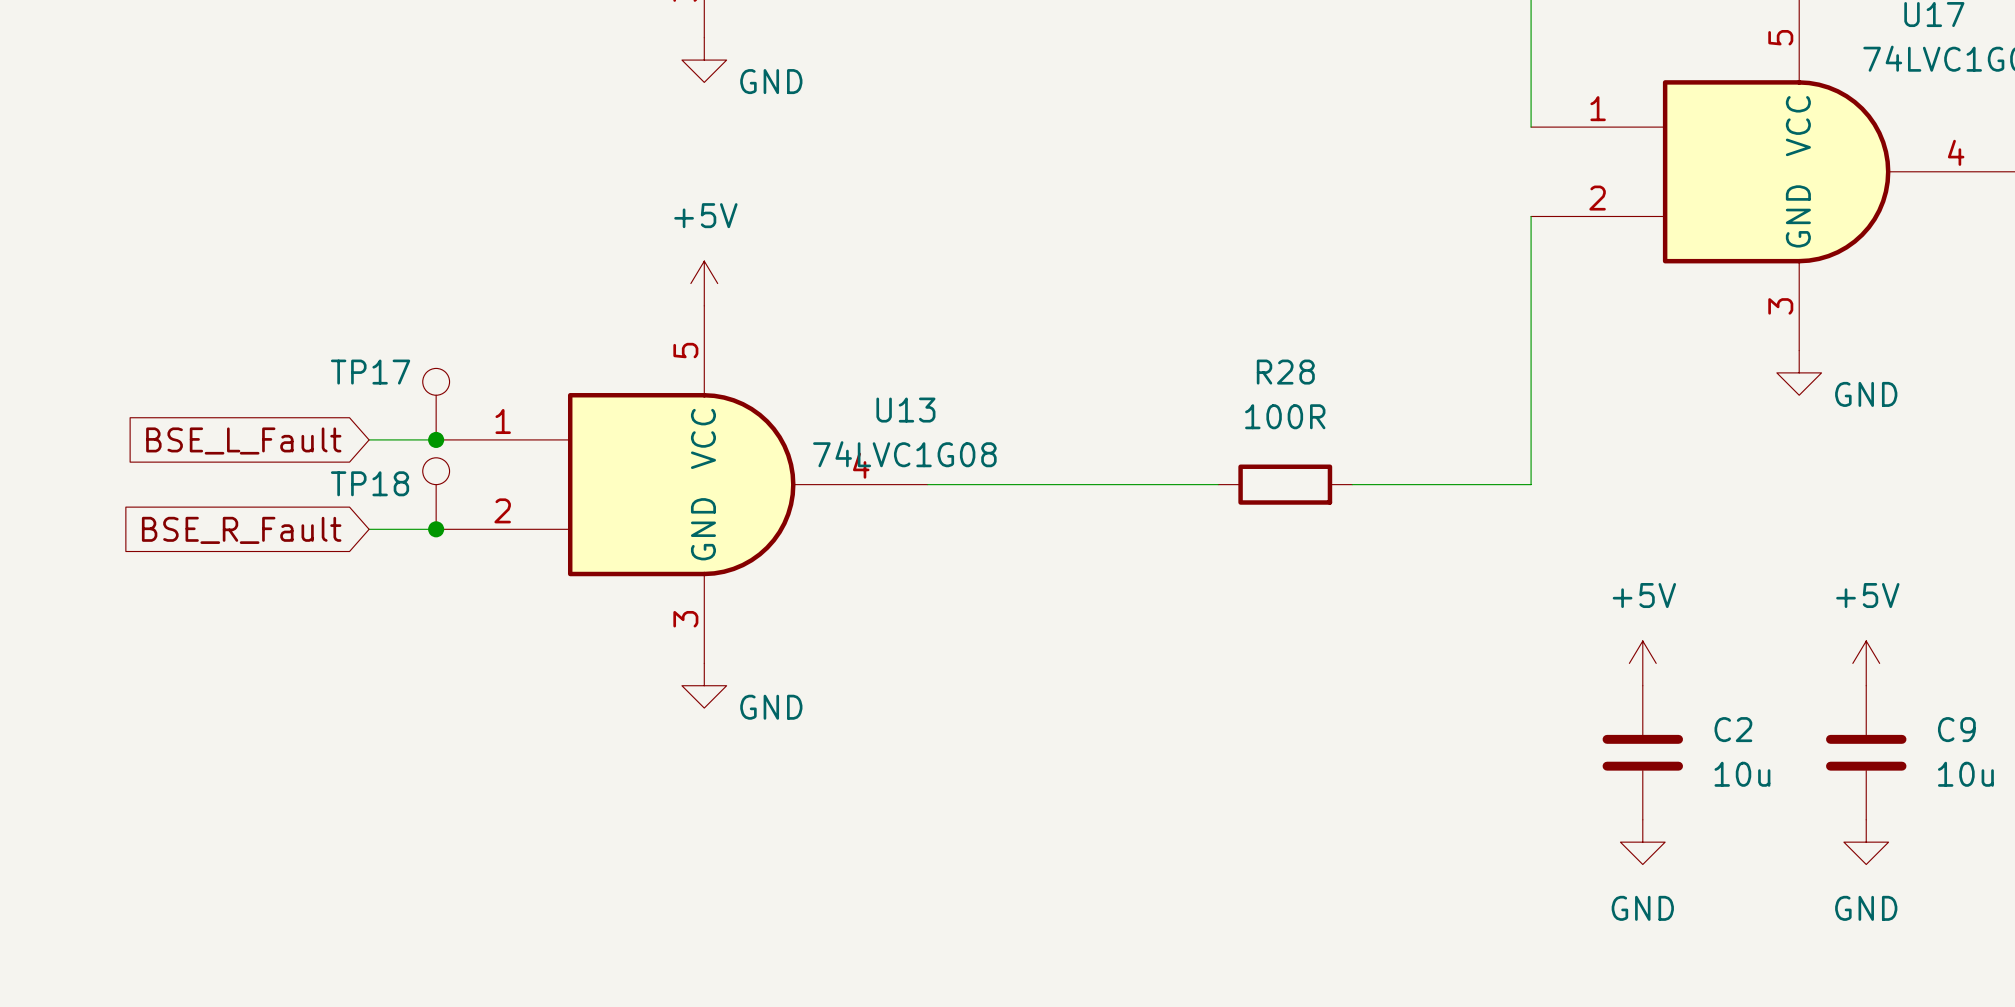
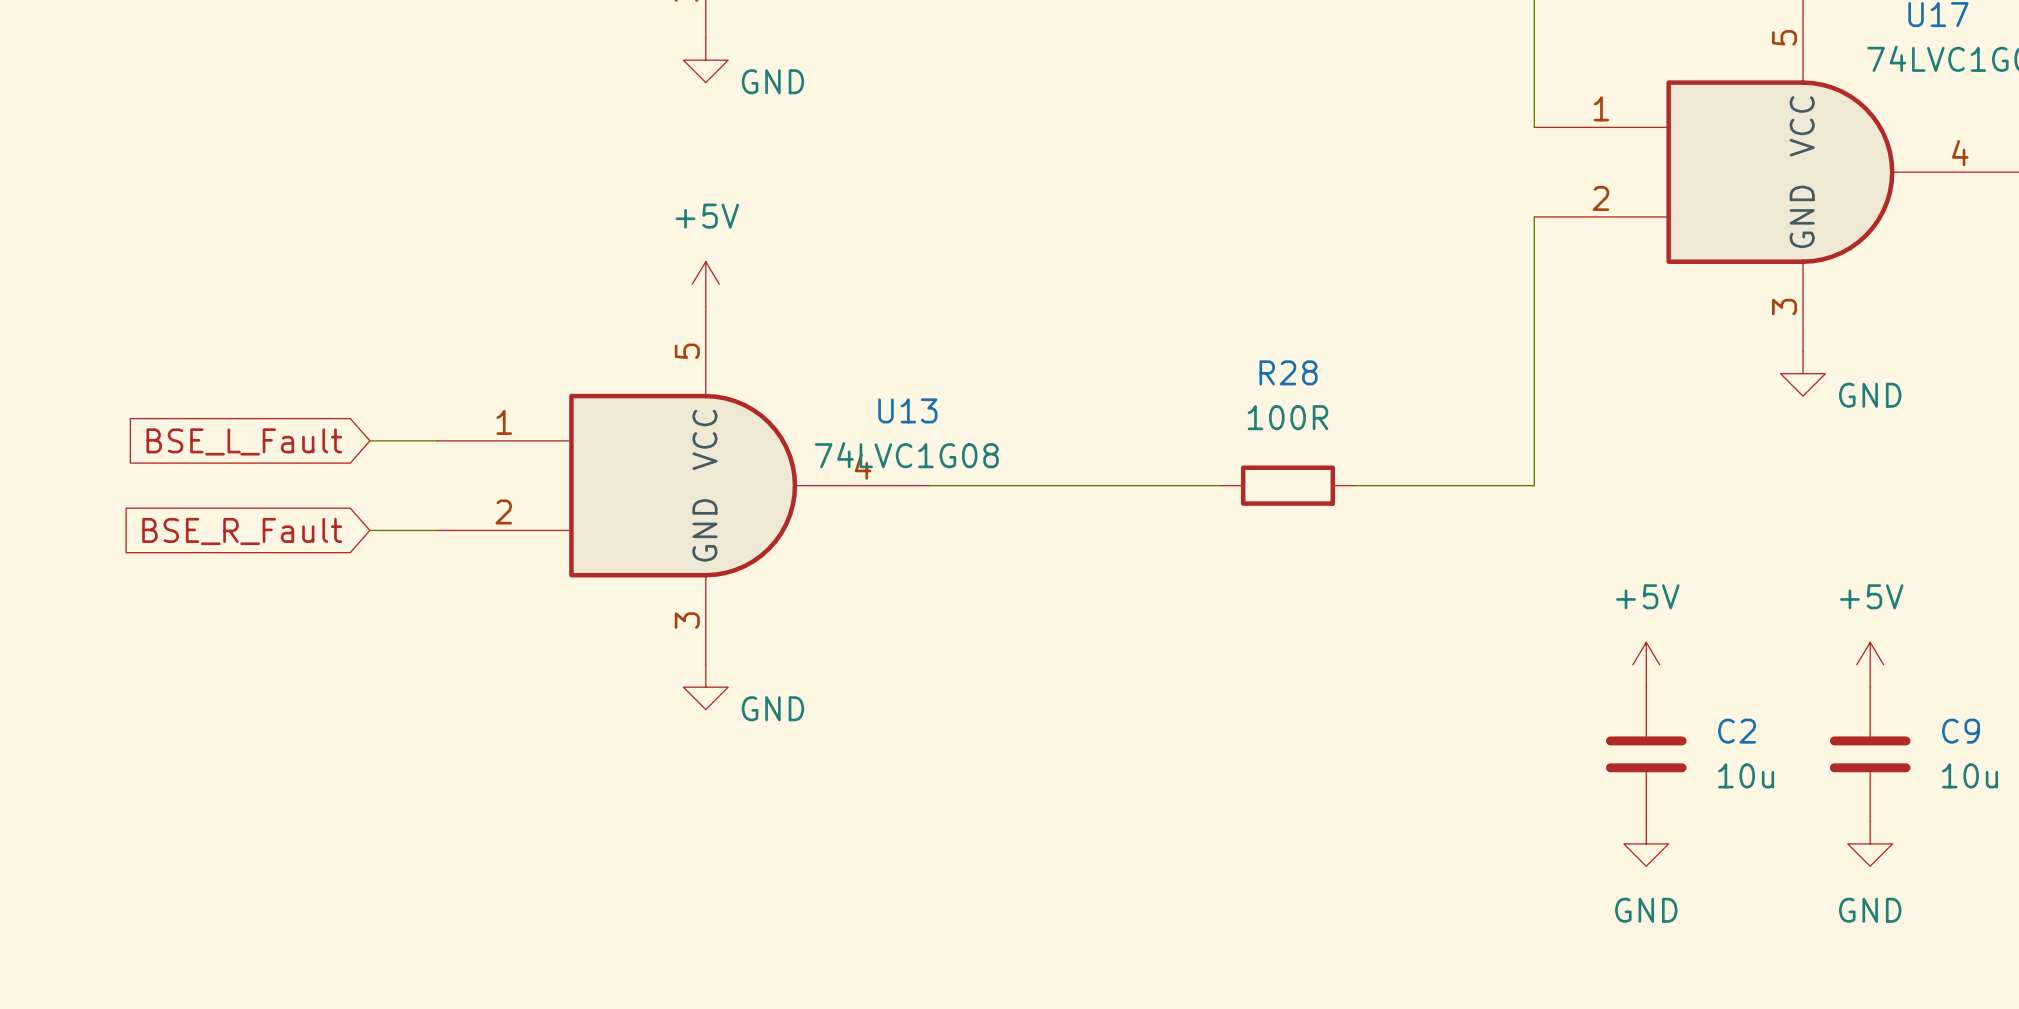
TP17: (436, 404) -> none
junction: (436, 439) -> none
TP18: (436, 493) -> none
junction: (436, 529) -> none

